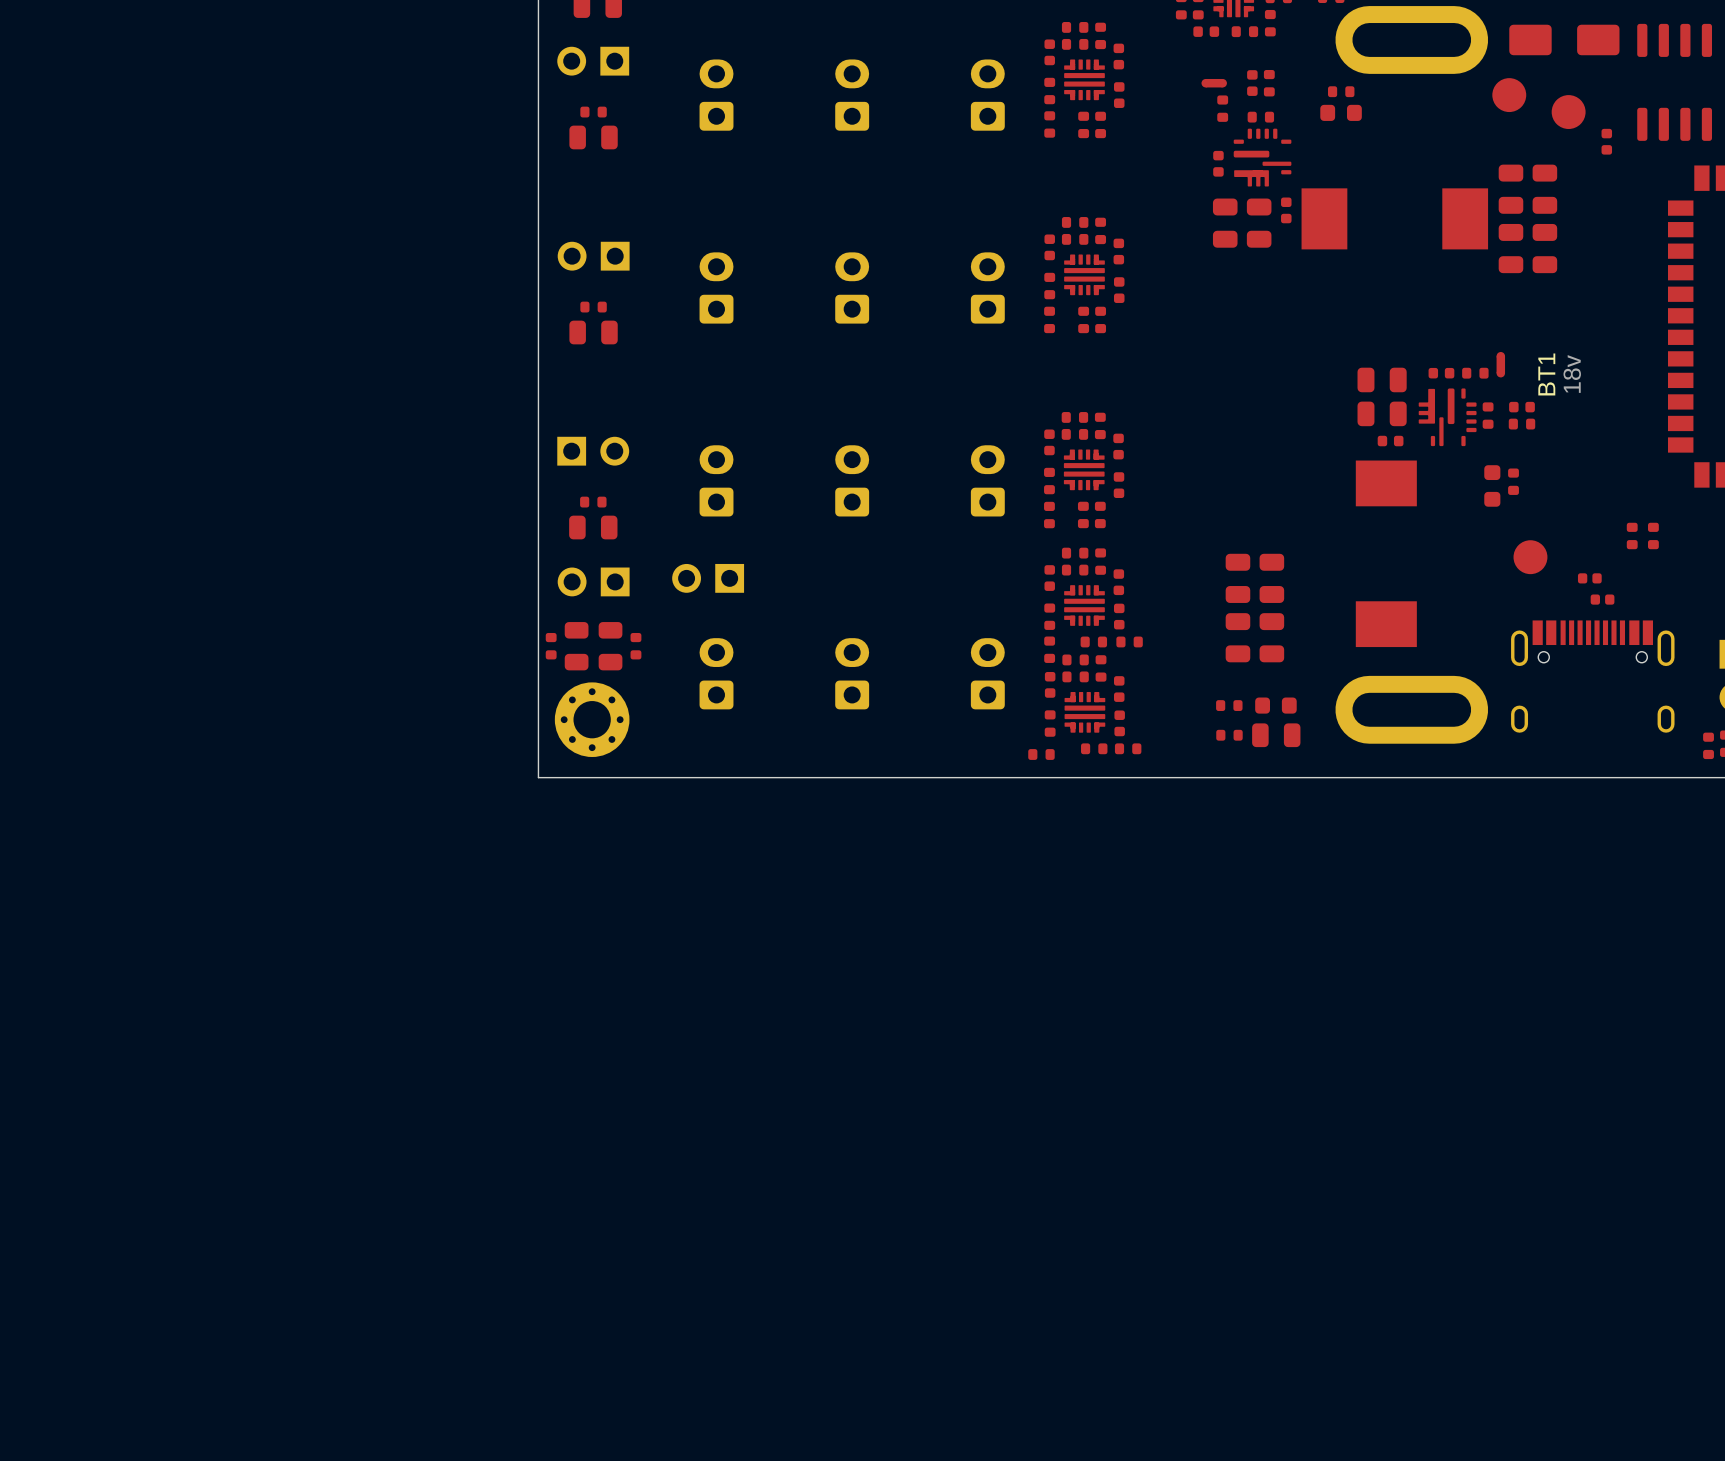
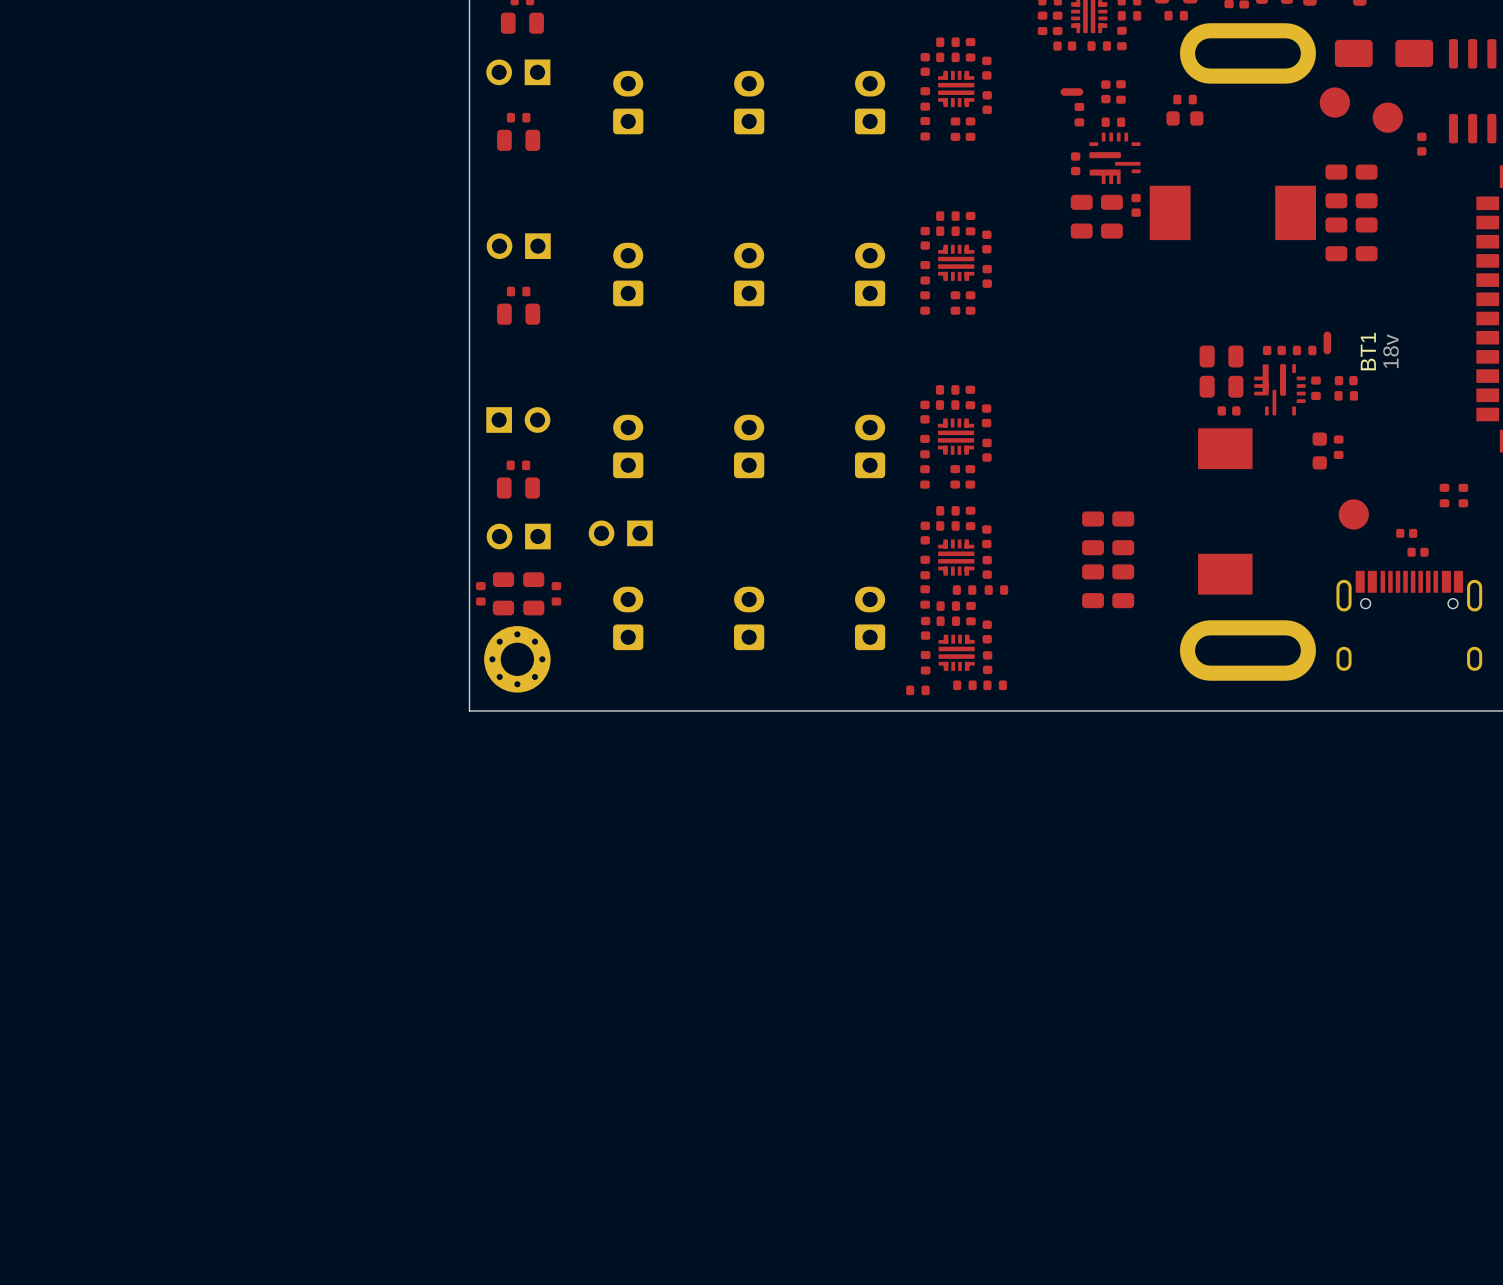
part: (1229, 705) -> none
part: (1275, 705) -> none
part: (1229, 735) -> none
part: (1276, 735) -> none

